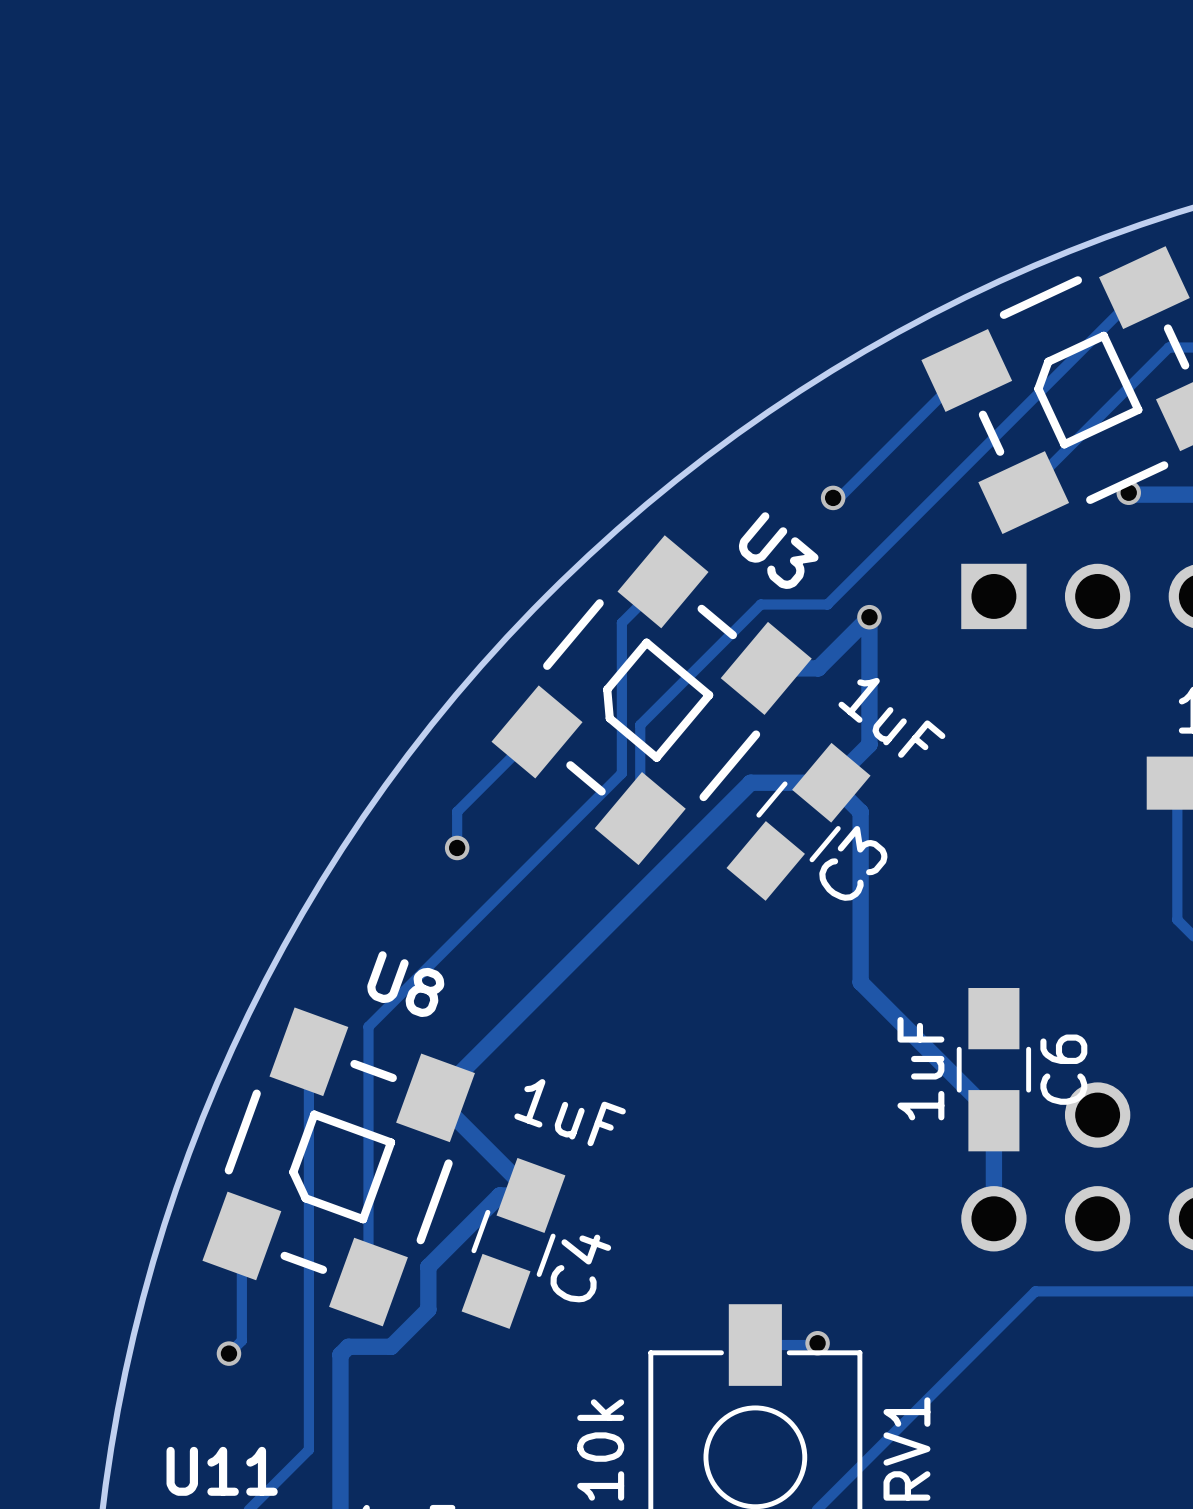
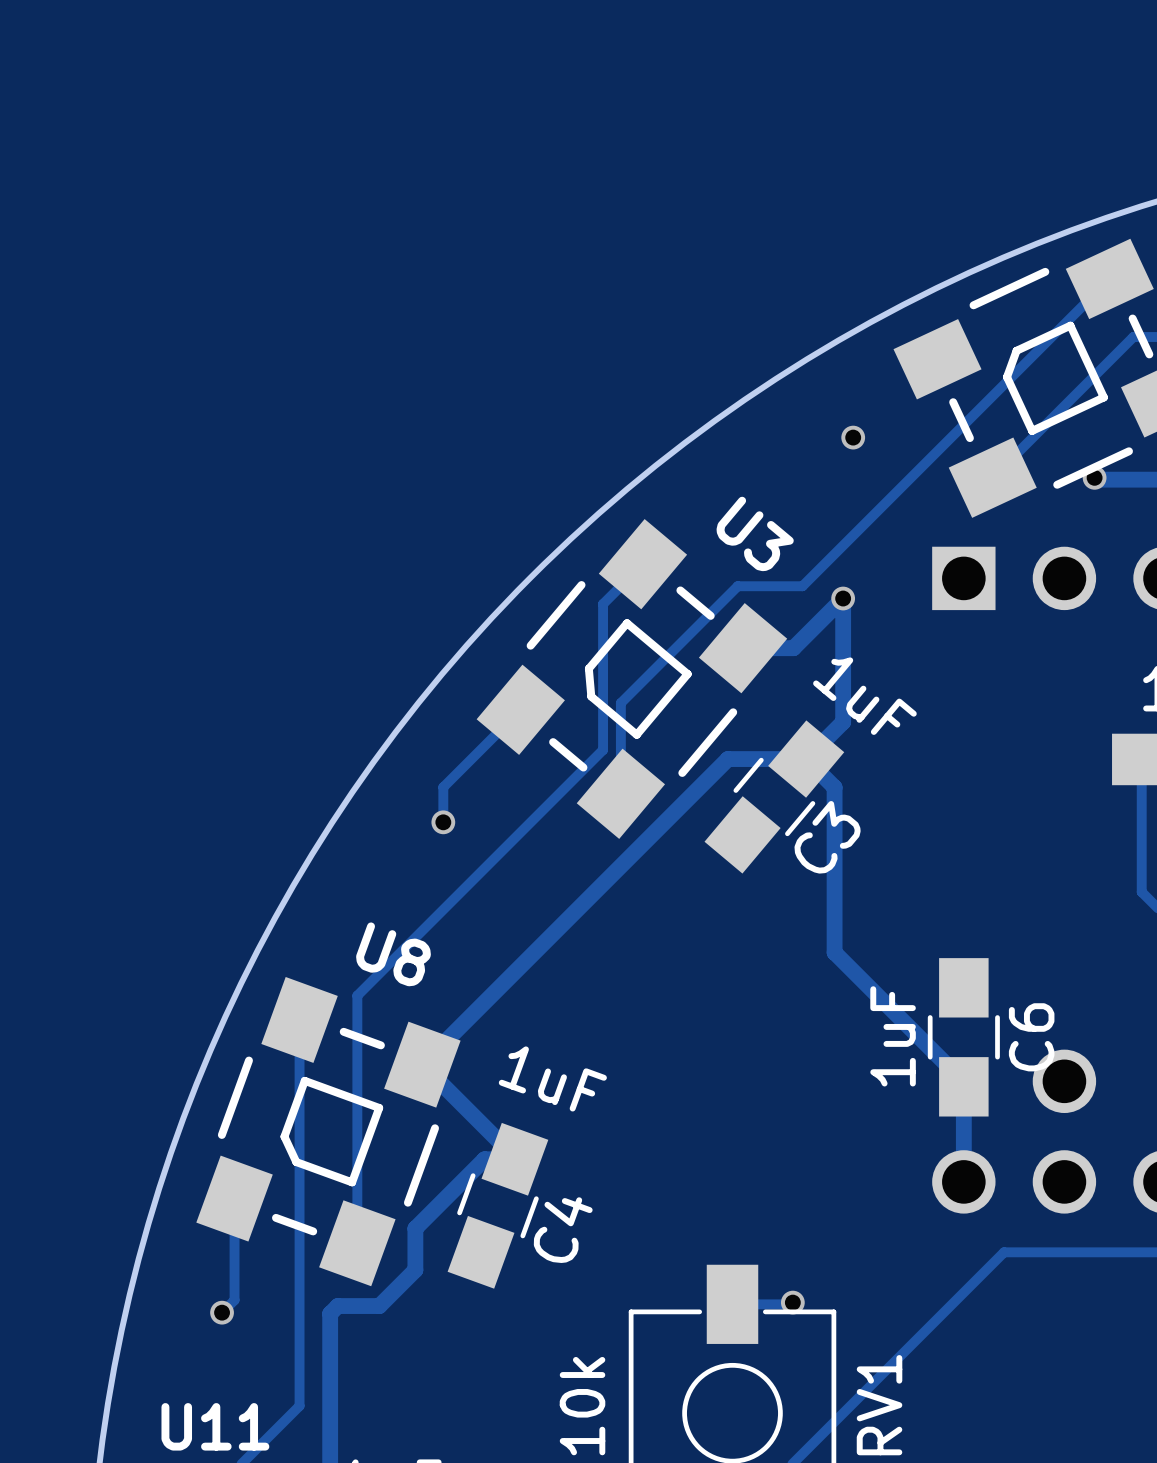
track: (966, 370) (839, 497) (833, 497) -> none
via position: (833, 497) -> (853, 437)

